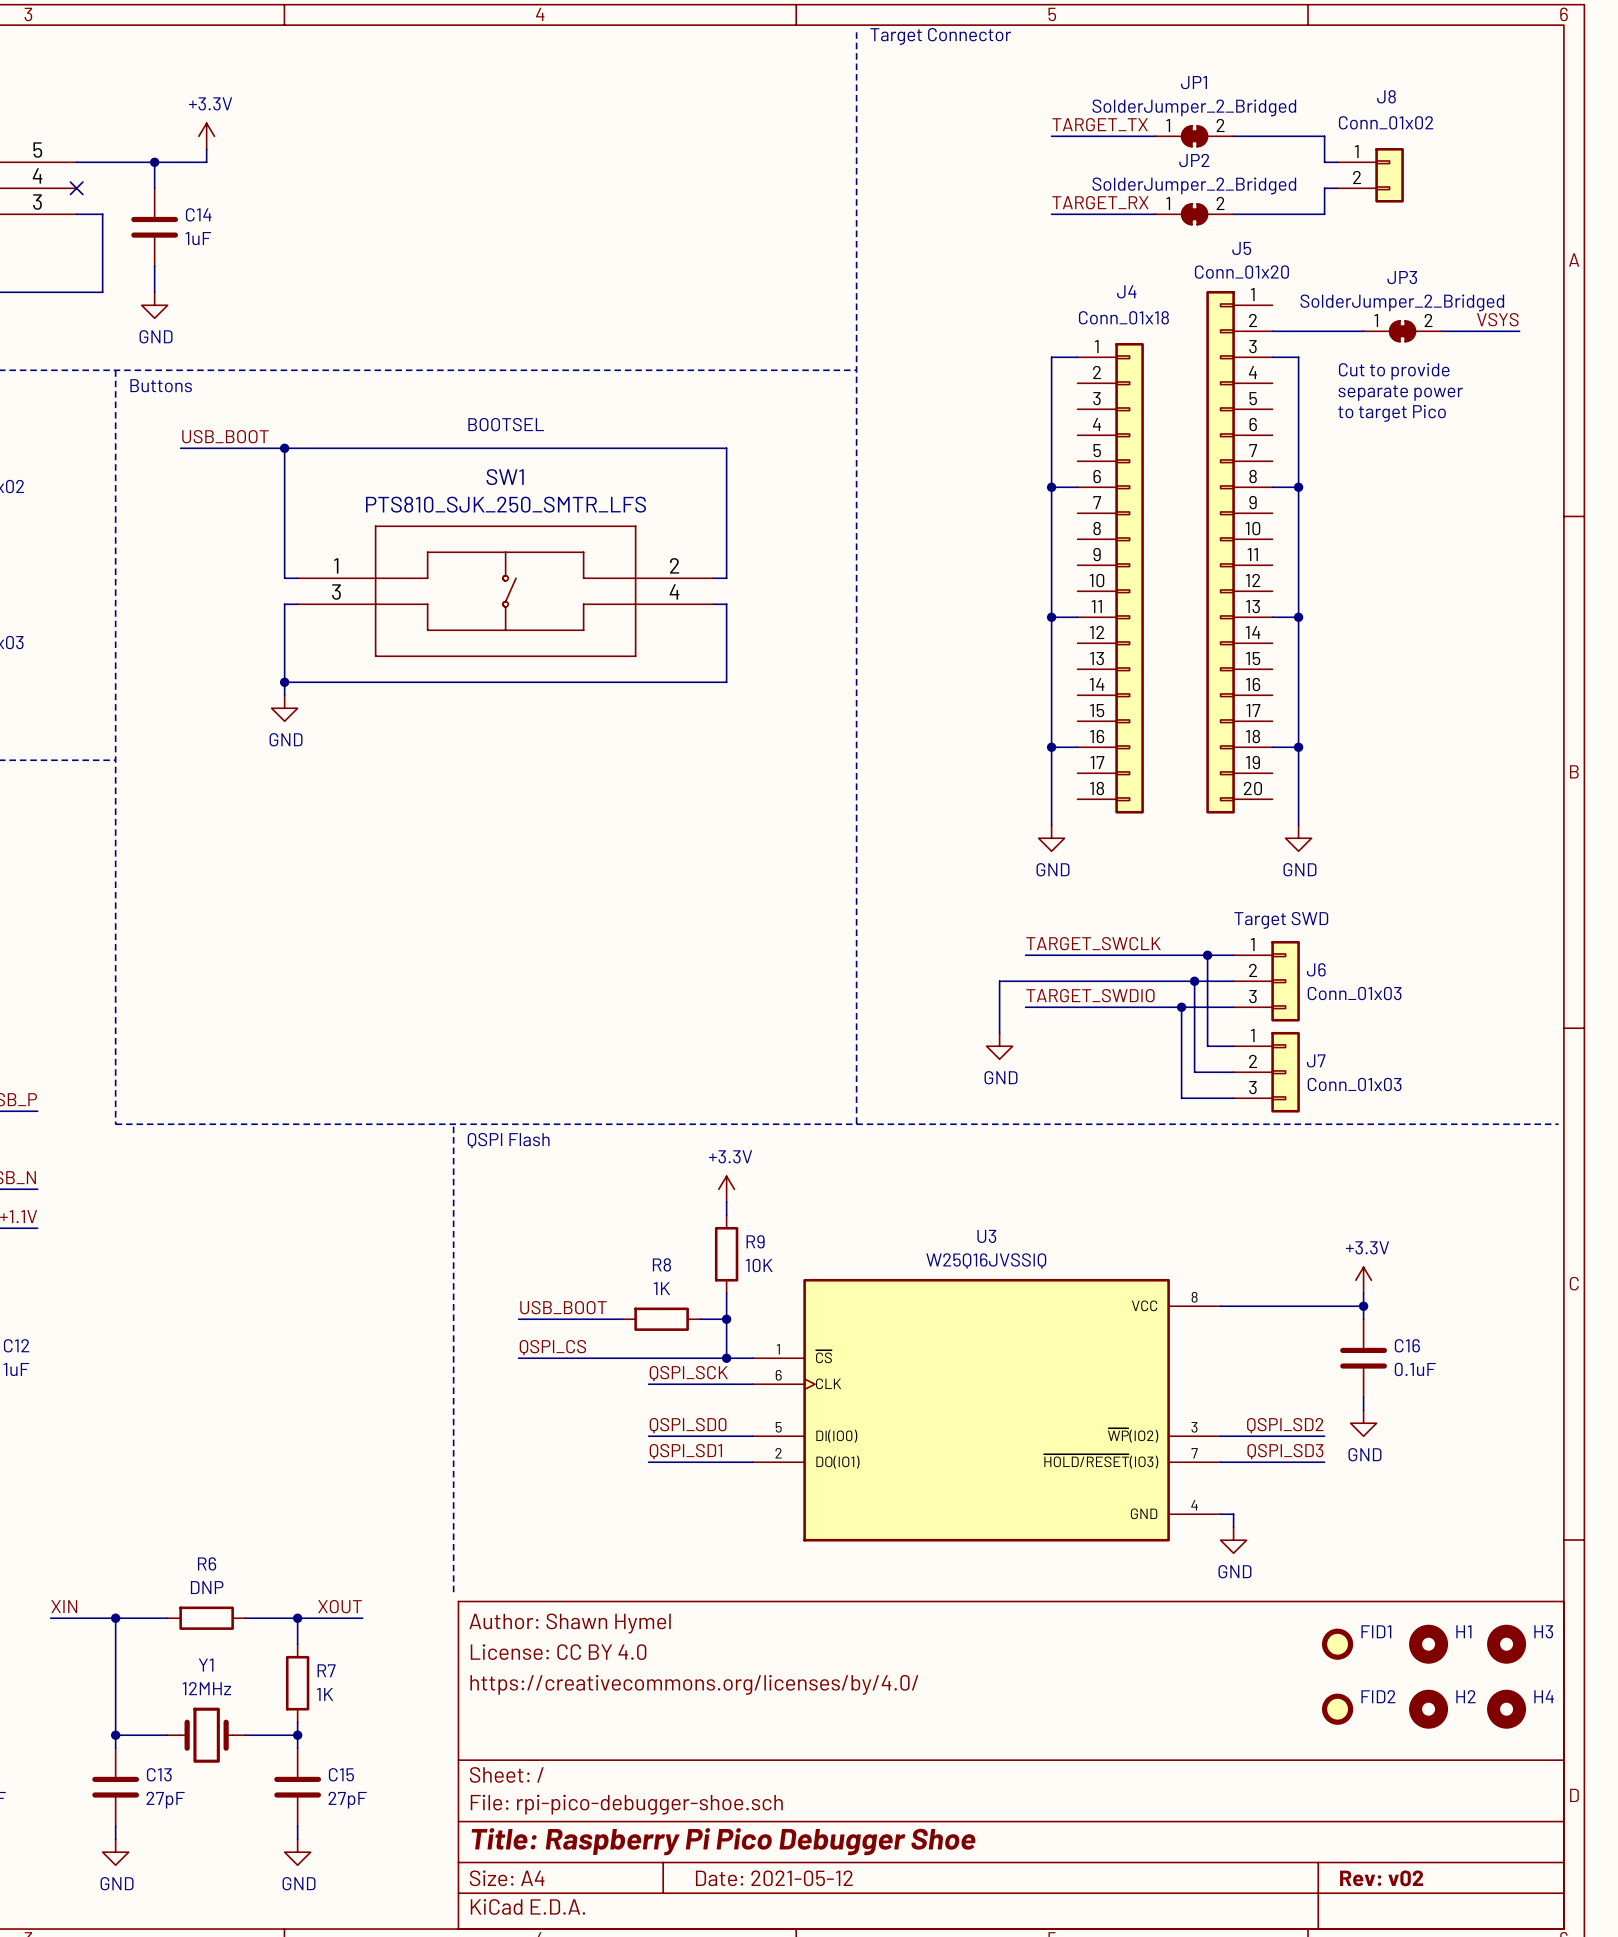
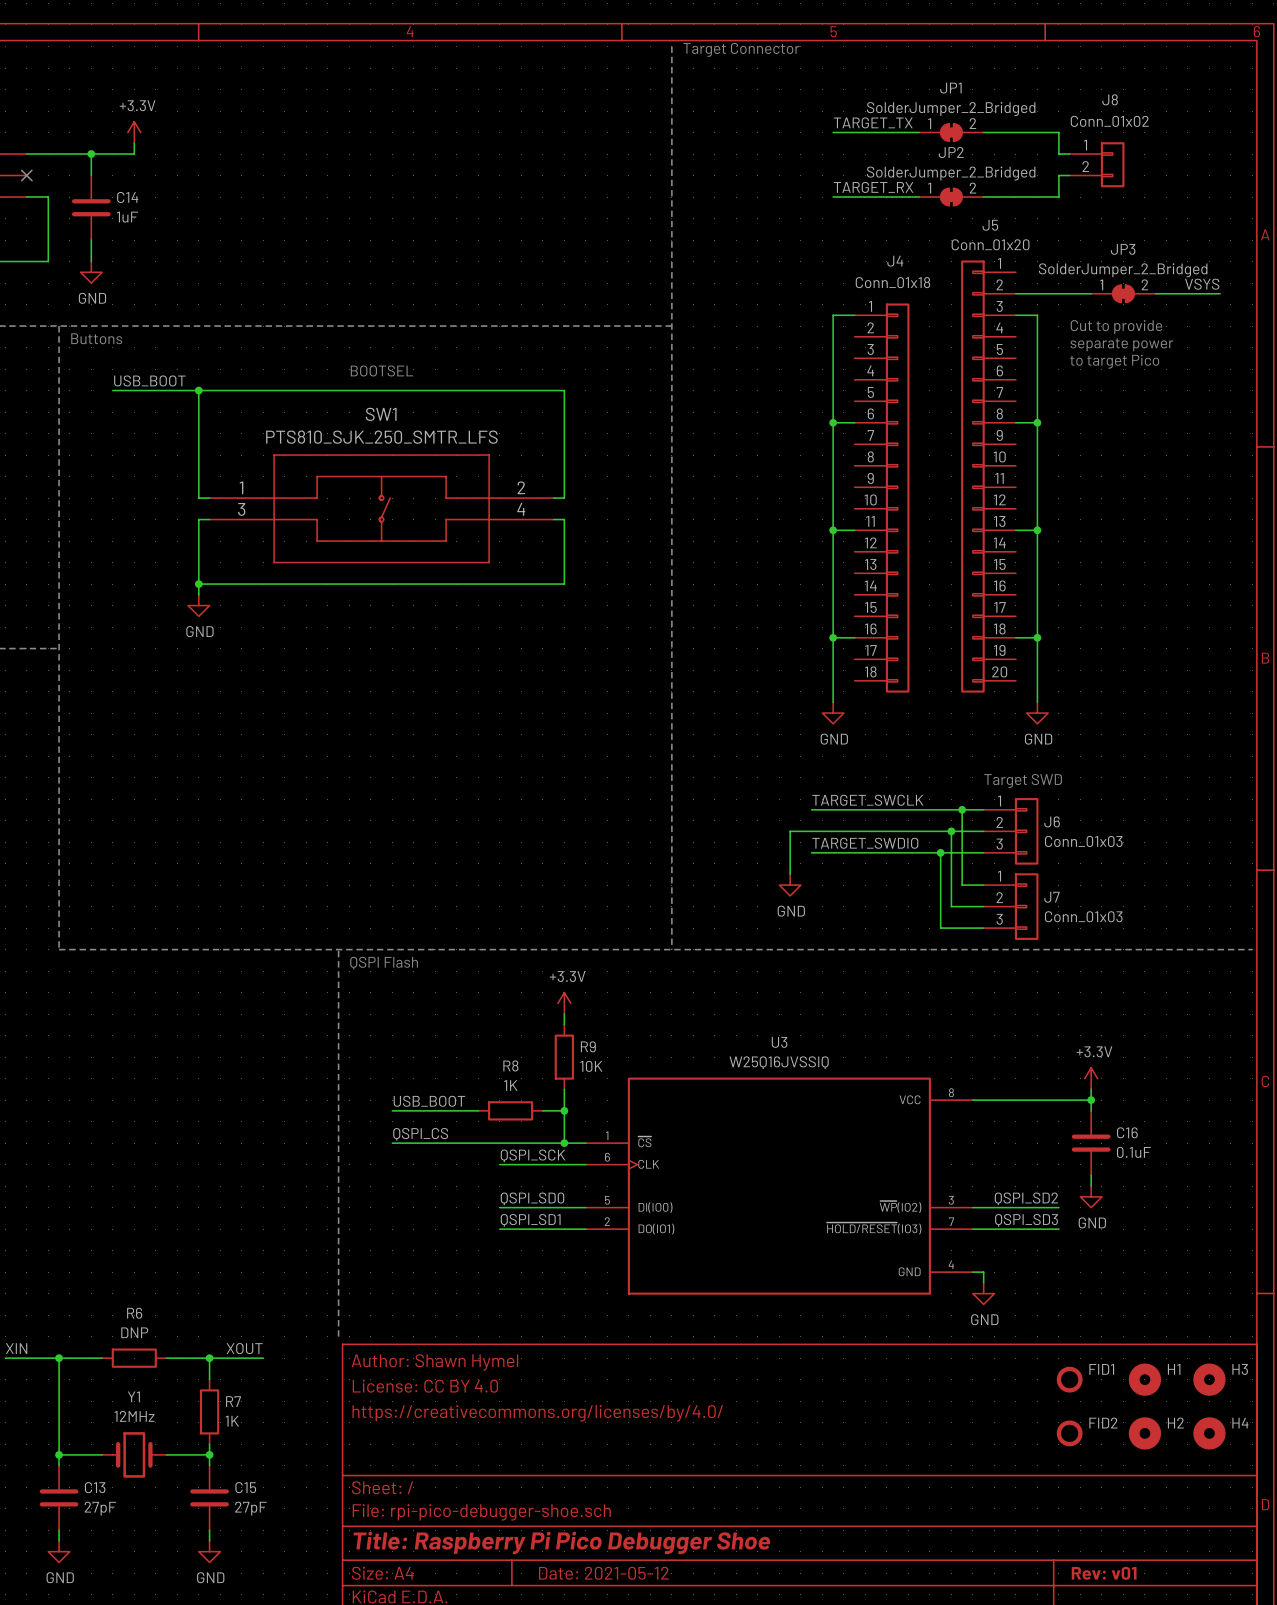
title block: Rev: v02 (1381, 1878) -> Rev: v01 (1104, 1573)

